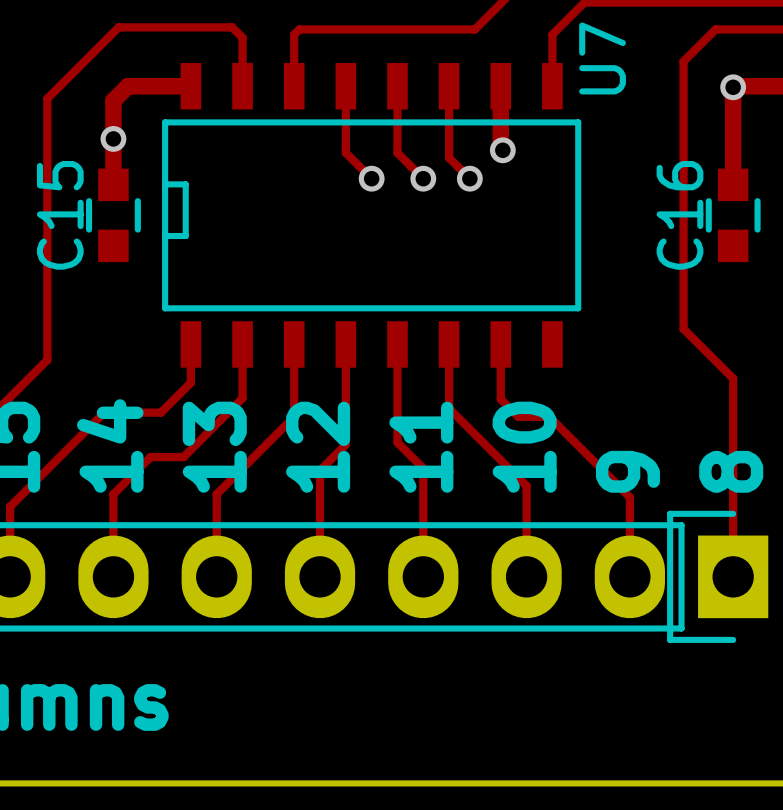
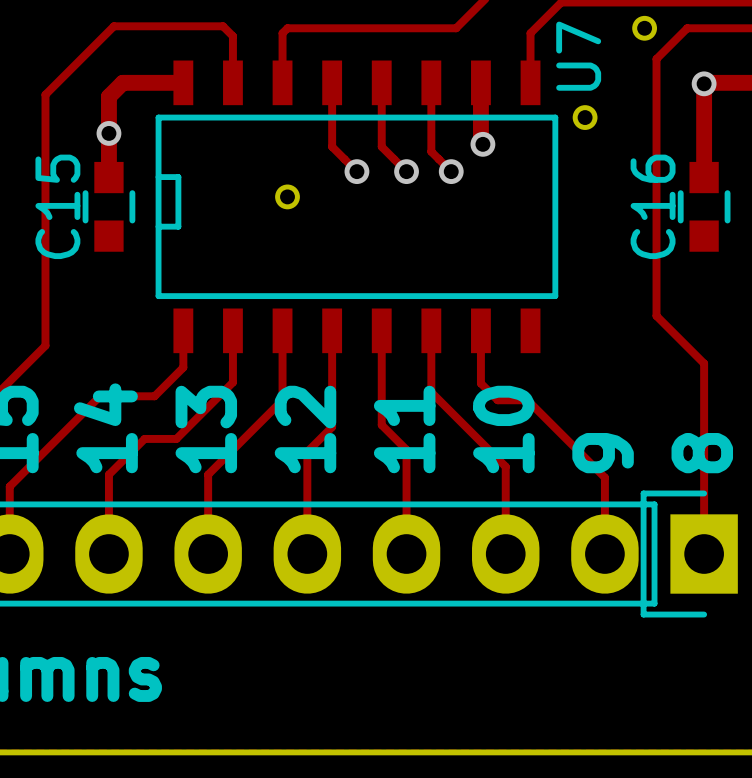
part: none -> (644, 28)
part: none -> (585, 117)
part: none -> (287, 196)

